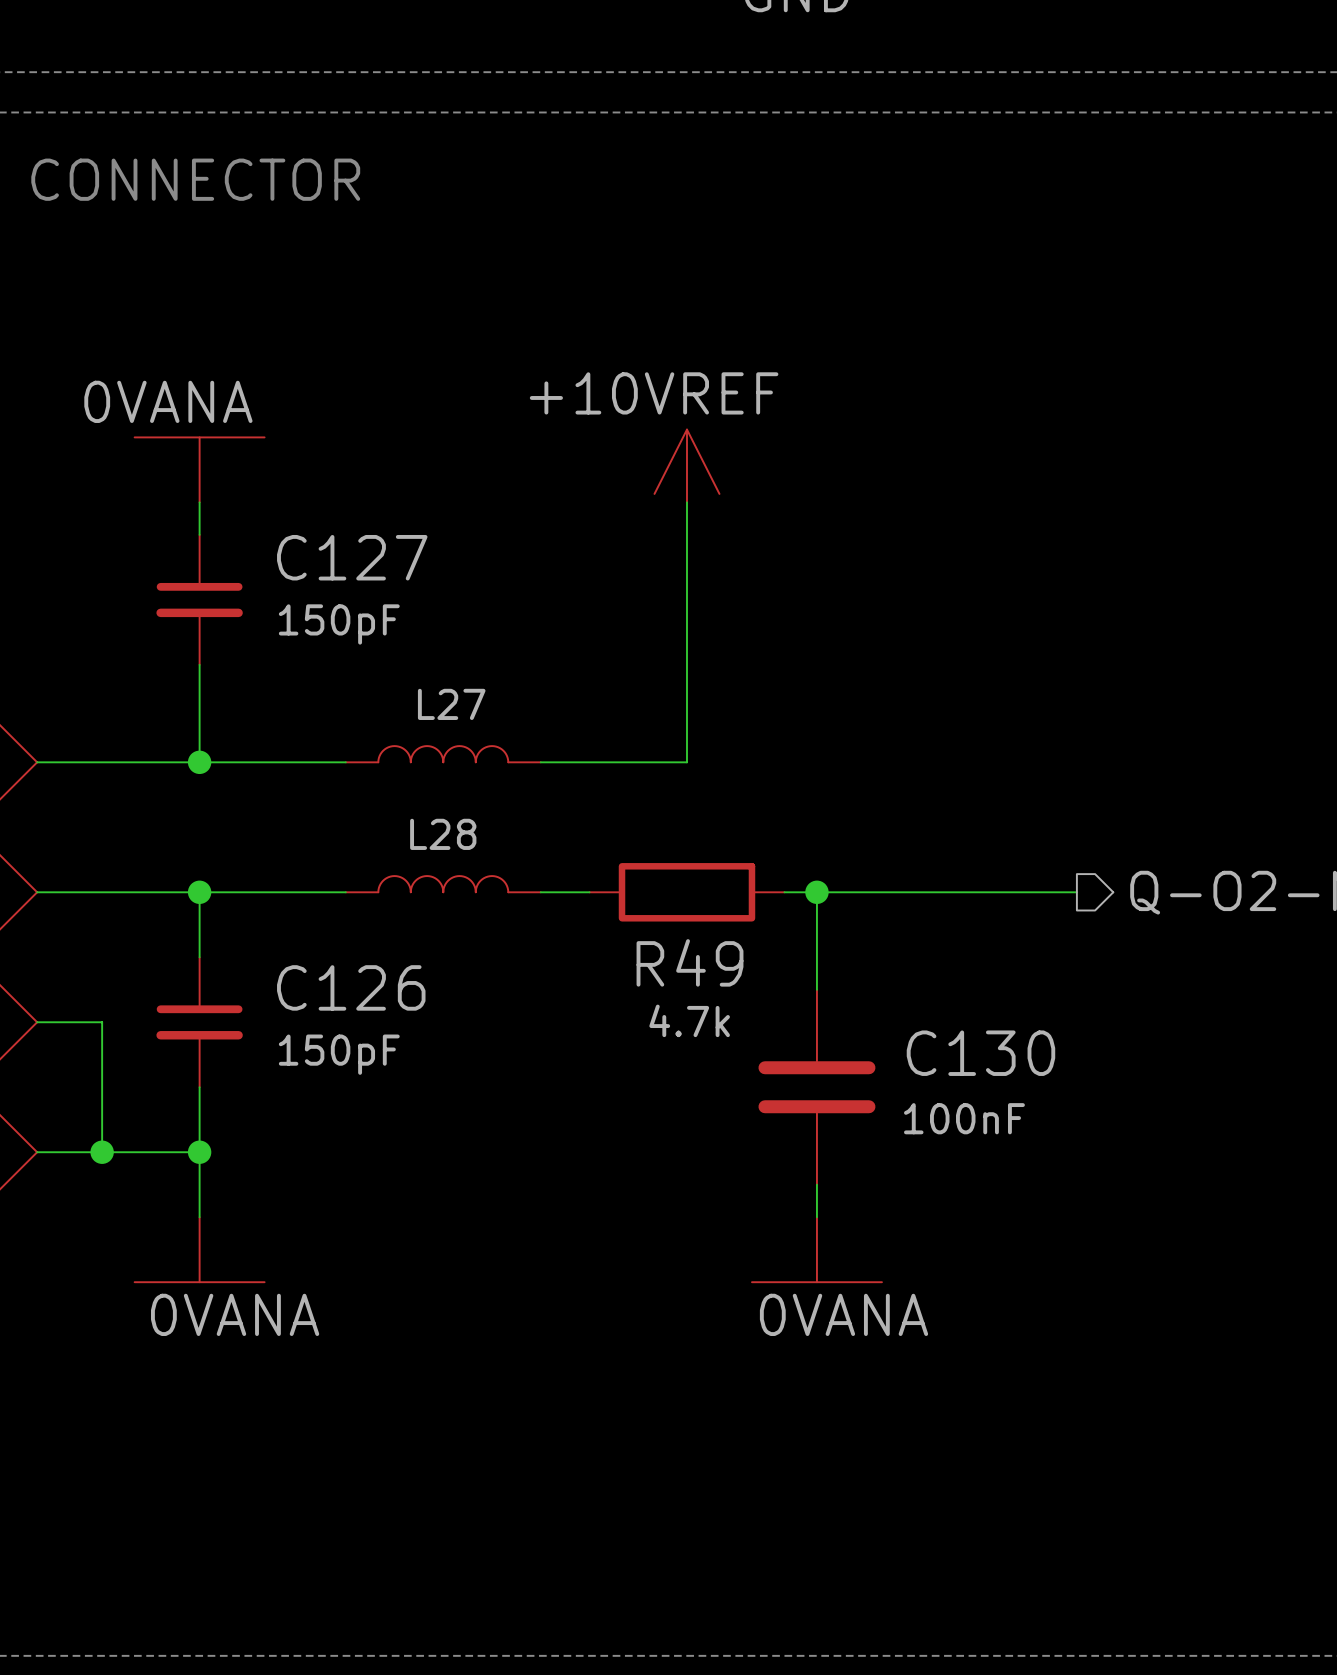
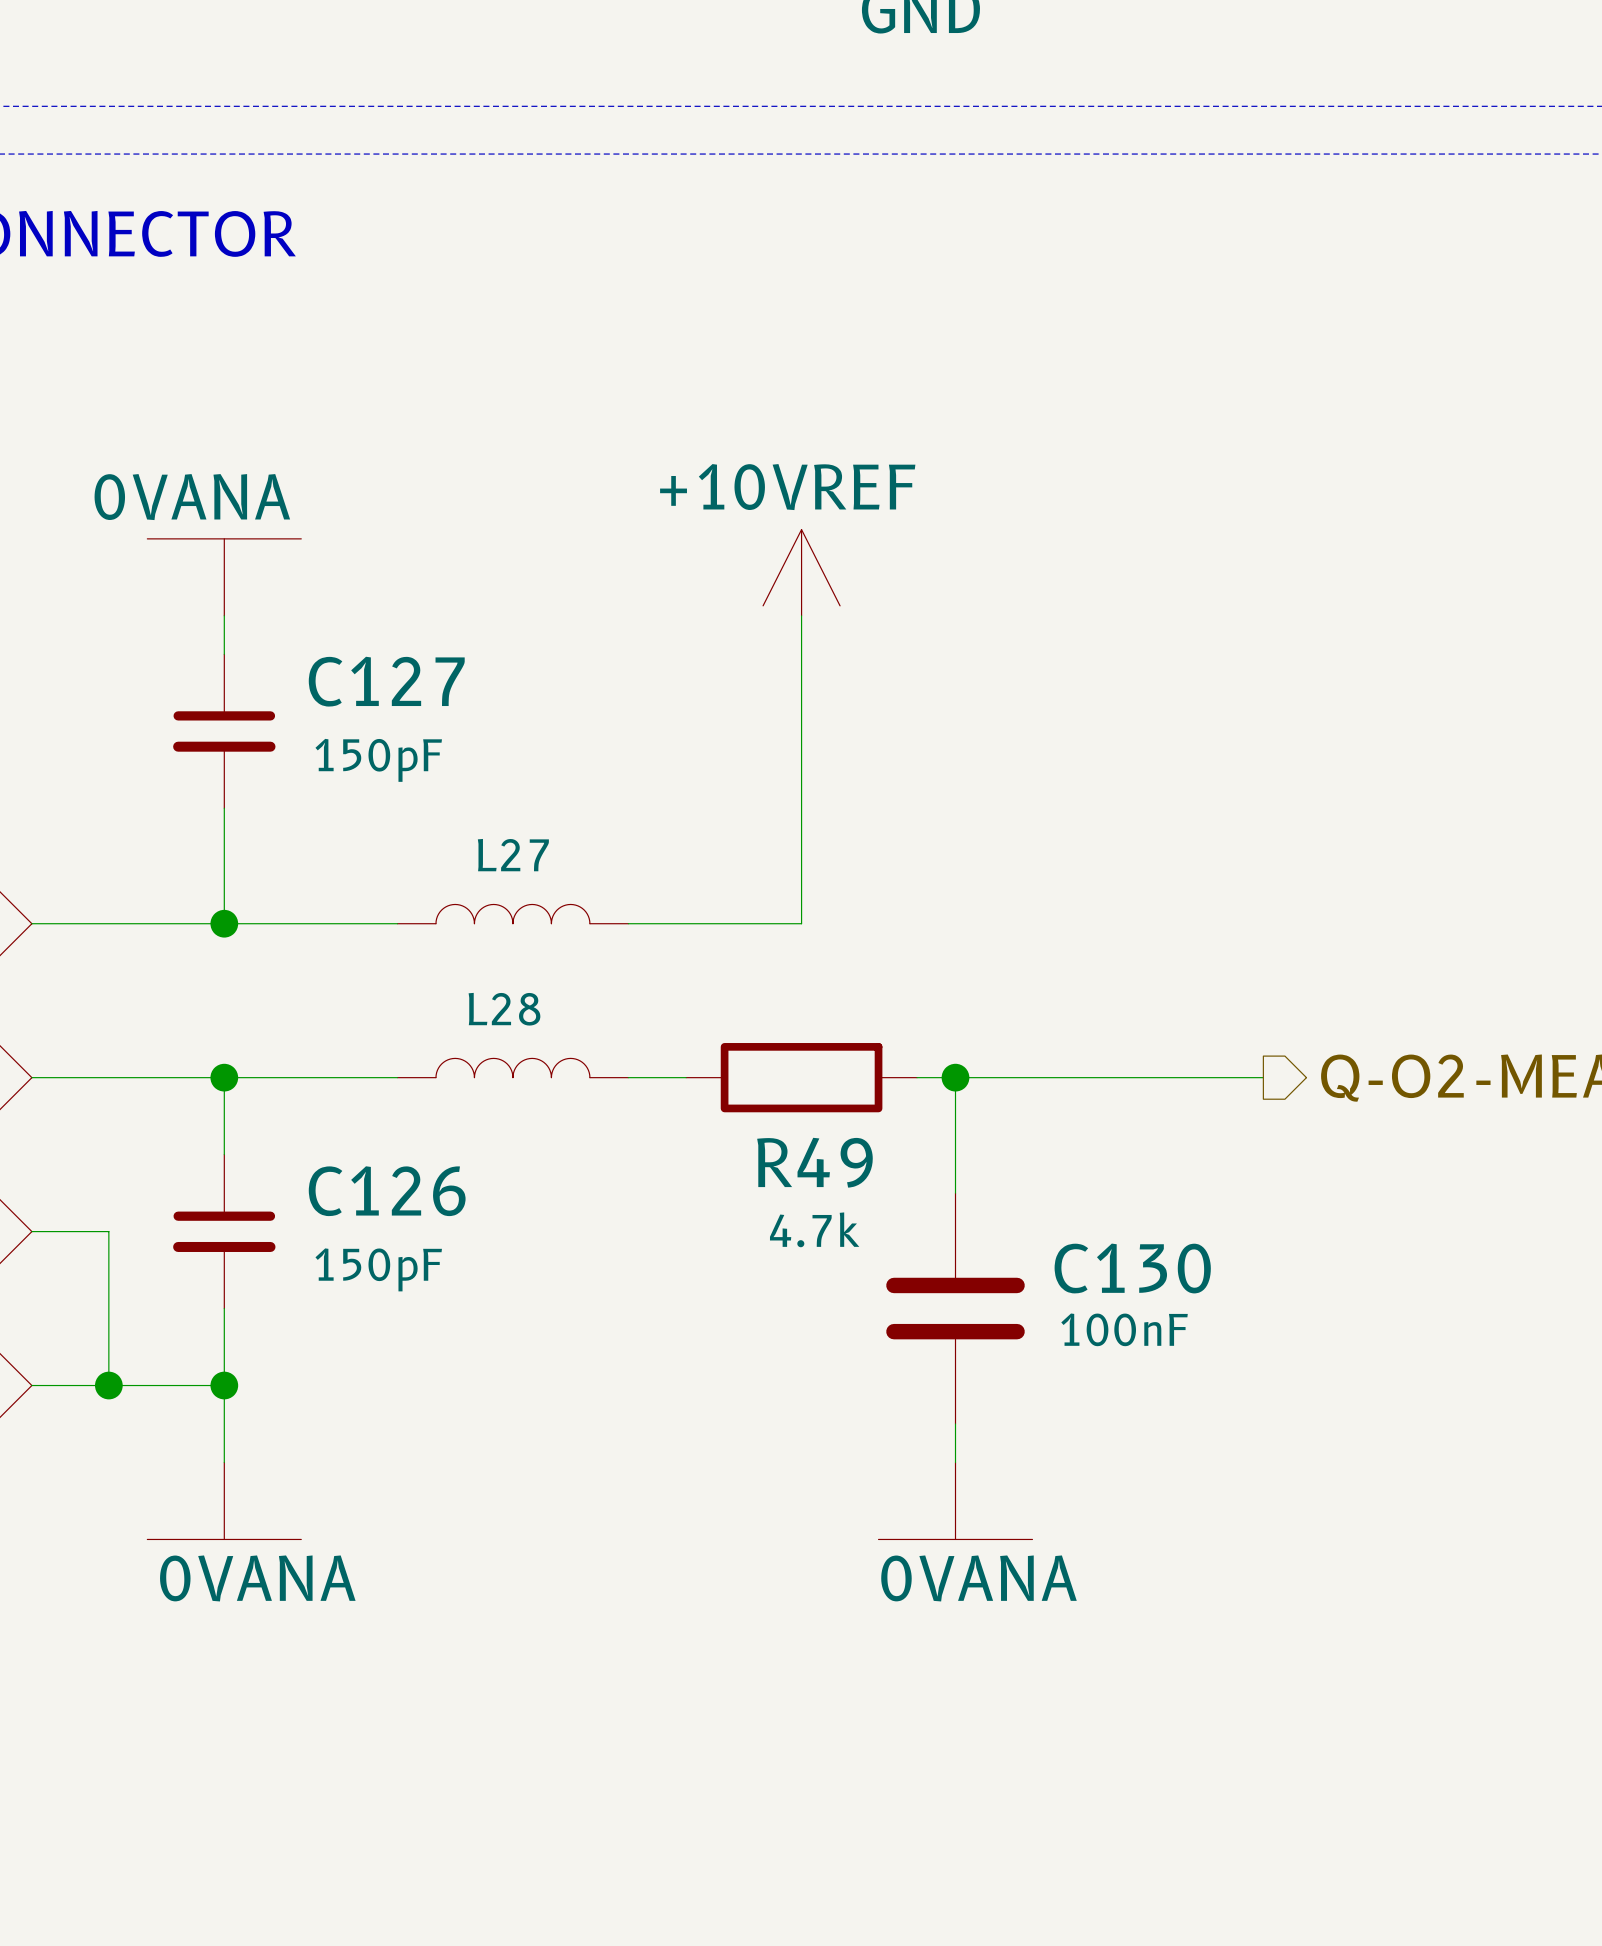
C130 value position: 100nF (964, 1118) -> 100nF (1124, 1329)

